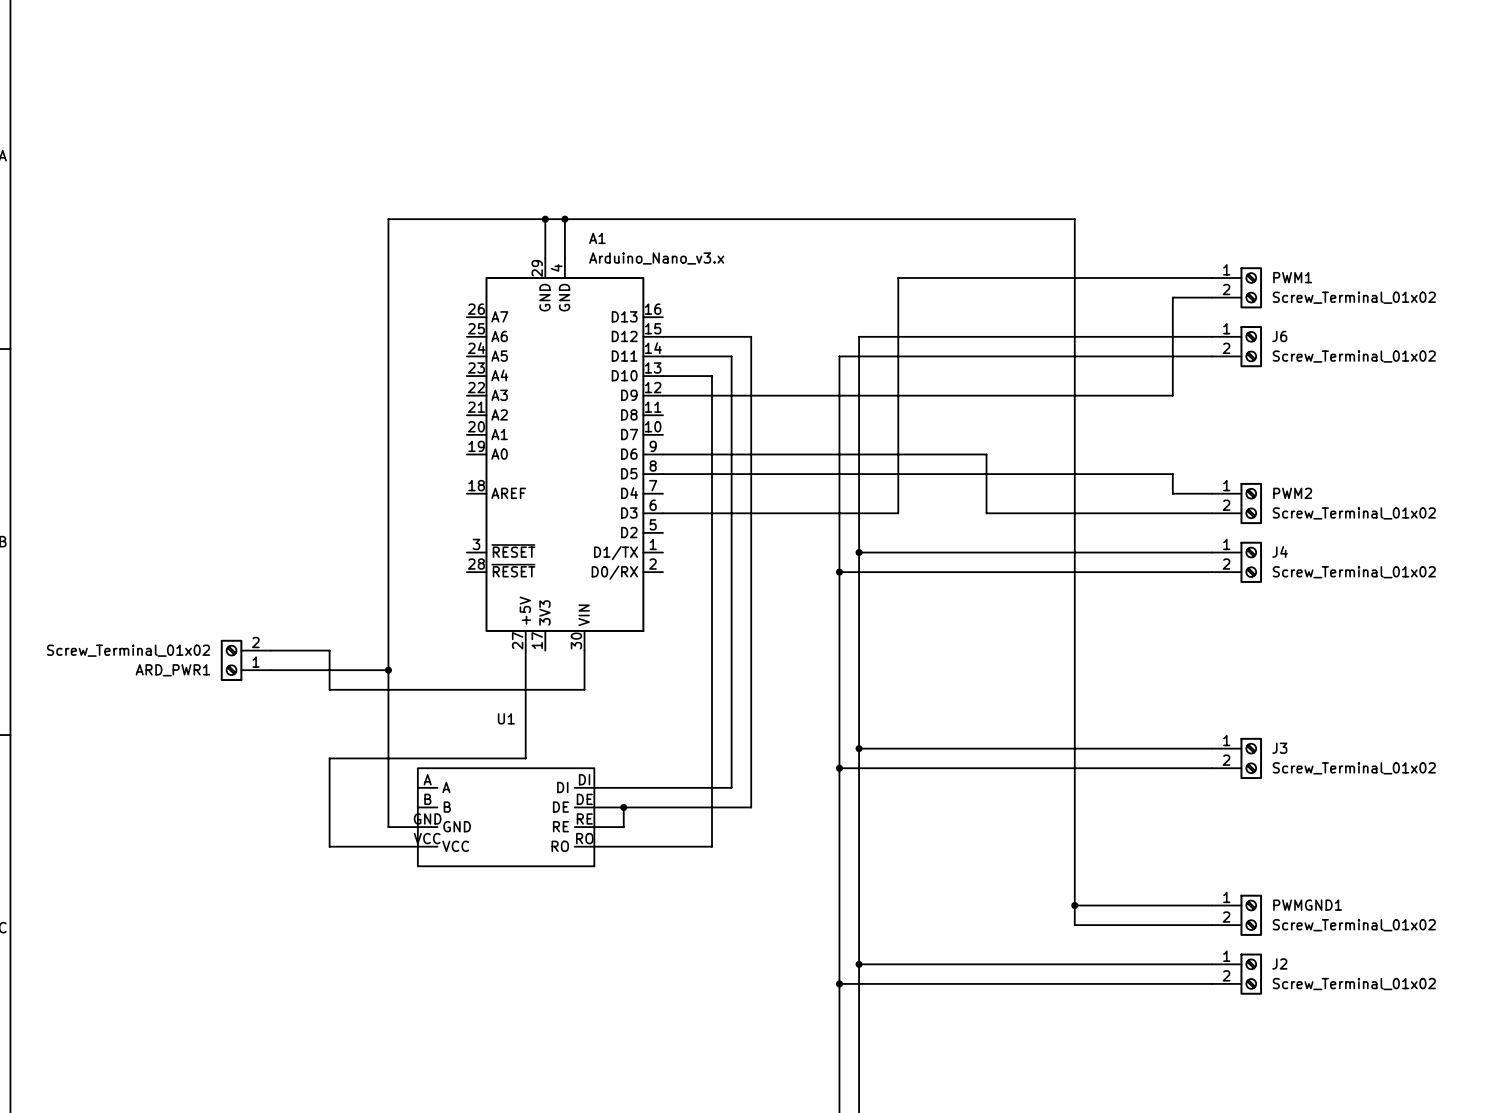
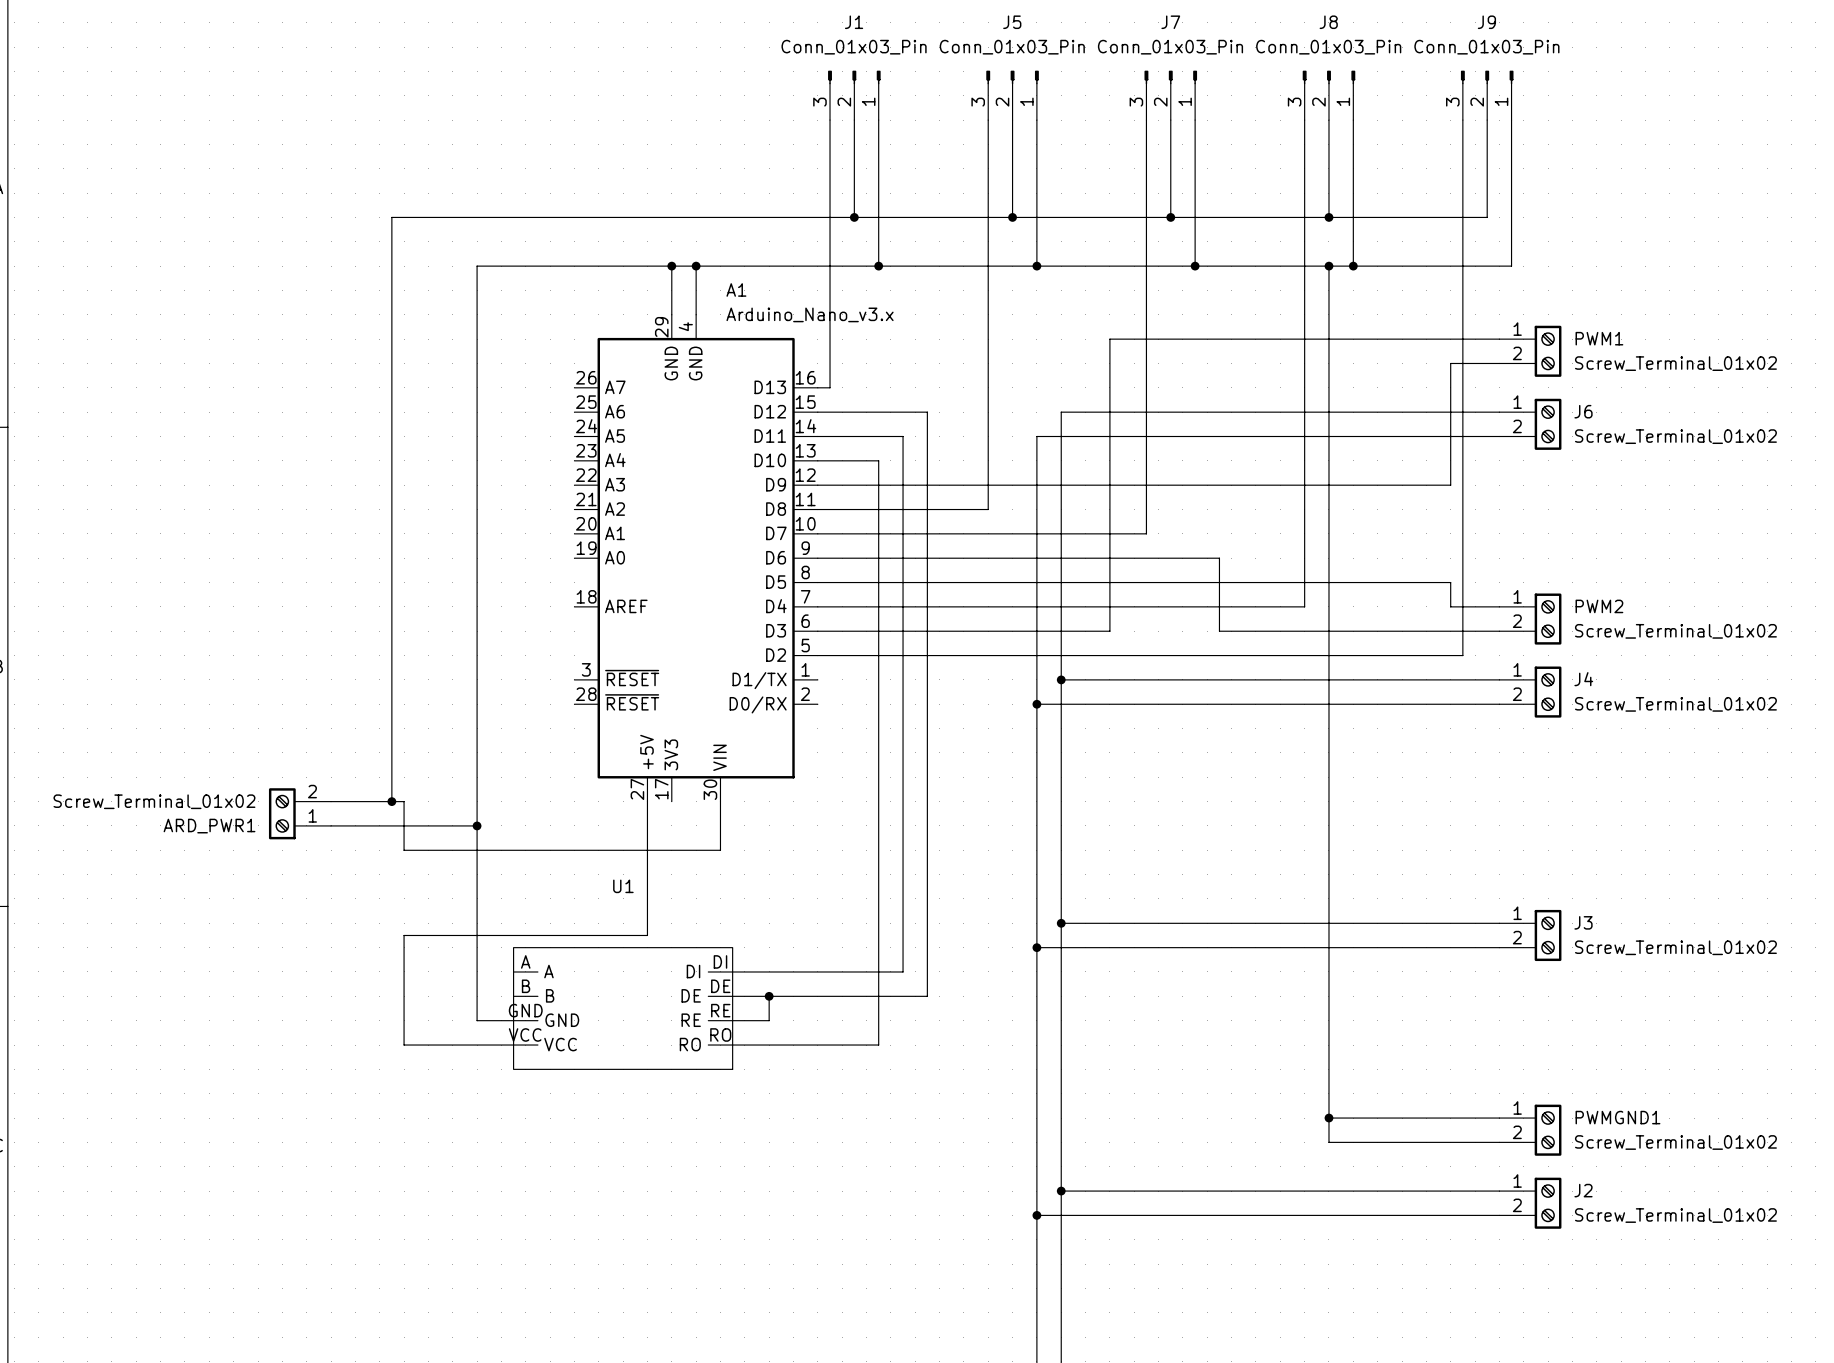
J1: none -> Conn_01x03_Pin (854, 95)
J5: none -> Conn_01x03_Pin (1012, 95)
J7: none -> Conn_01x03_Pin (1170, 95)
J8: none -> Conn_01x03_Pin (1328, 95)
J9: none -> Conn_01x03_Pin (1487, 95)
wire: none -> (830, 120) (830, 387) (817, 387)
wire: none -> (854, 120) (854, 217)
wire: none -> (878, 120) (878, 266)
wire: none -> (988, 120) (988, 509) (817, 509)
wire: none -> (1012, 120) (1012, 217)
wire: none -> (1036, 120) (1036, 266)
wire: none -> (1146, 120) (1146, 533) (817, 533)
wire: none -> (1170, 120) (1170, 217)
wire: none -> (1195, 120) (1195, 266)
wire: none -> (1304, 120) (1304, 606) (817, 606)
wire: none -> (1328, 120) (1328, 217)
wire: none -> (1353, 120) (1353, 266)
wire: none -> (1462, 120) (1462, 655) (817, 655)
wire: none -> (1487, 120) (1487, 217) (391, 217) (391, 801)
wire: none -> (1511, 120) (1511, 266) (1328, 266)
junction: none -> (854, 217)
junction: none -> (1012, 217)
junction: none -> (1170, 217)
junction: none -> (1328, 217)
junction: none -> (878, 266)
junction: none -> (1036, 266)
junction: none -> (1195, 266)
junction: none -> (1328, 266)
junction: none -> (1353, 266)
junction: none -> (391, 801)

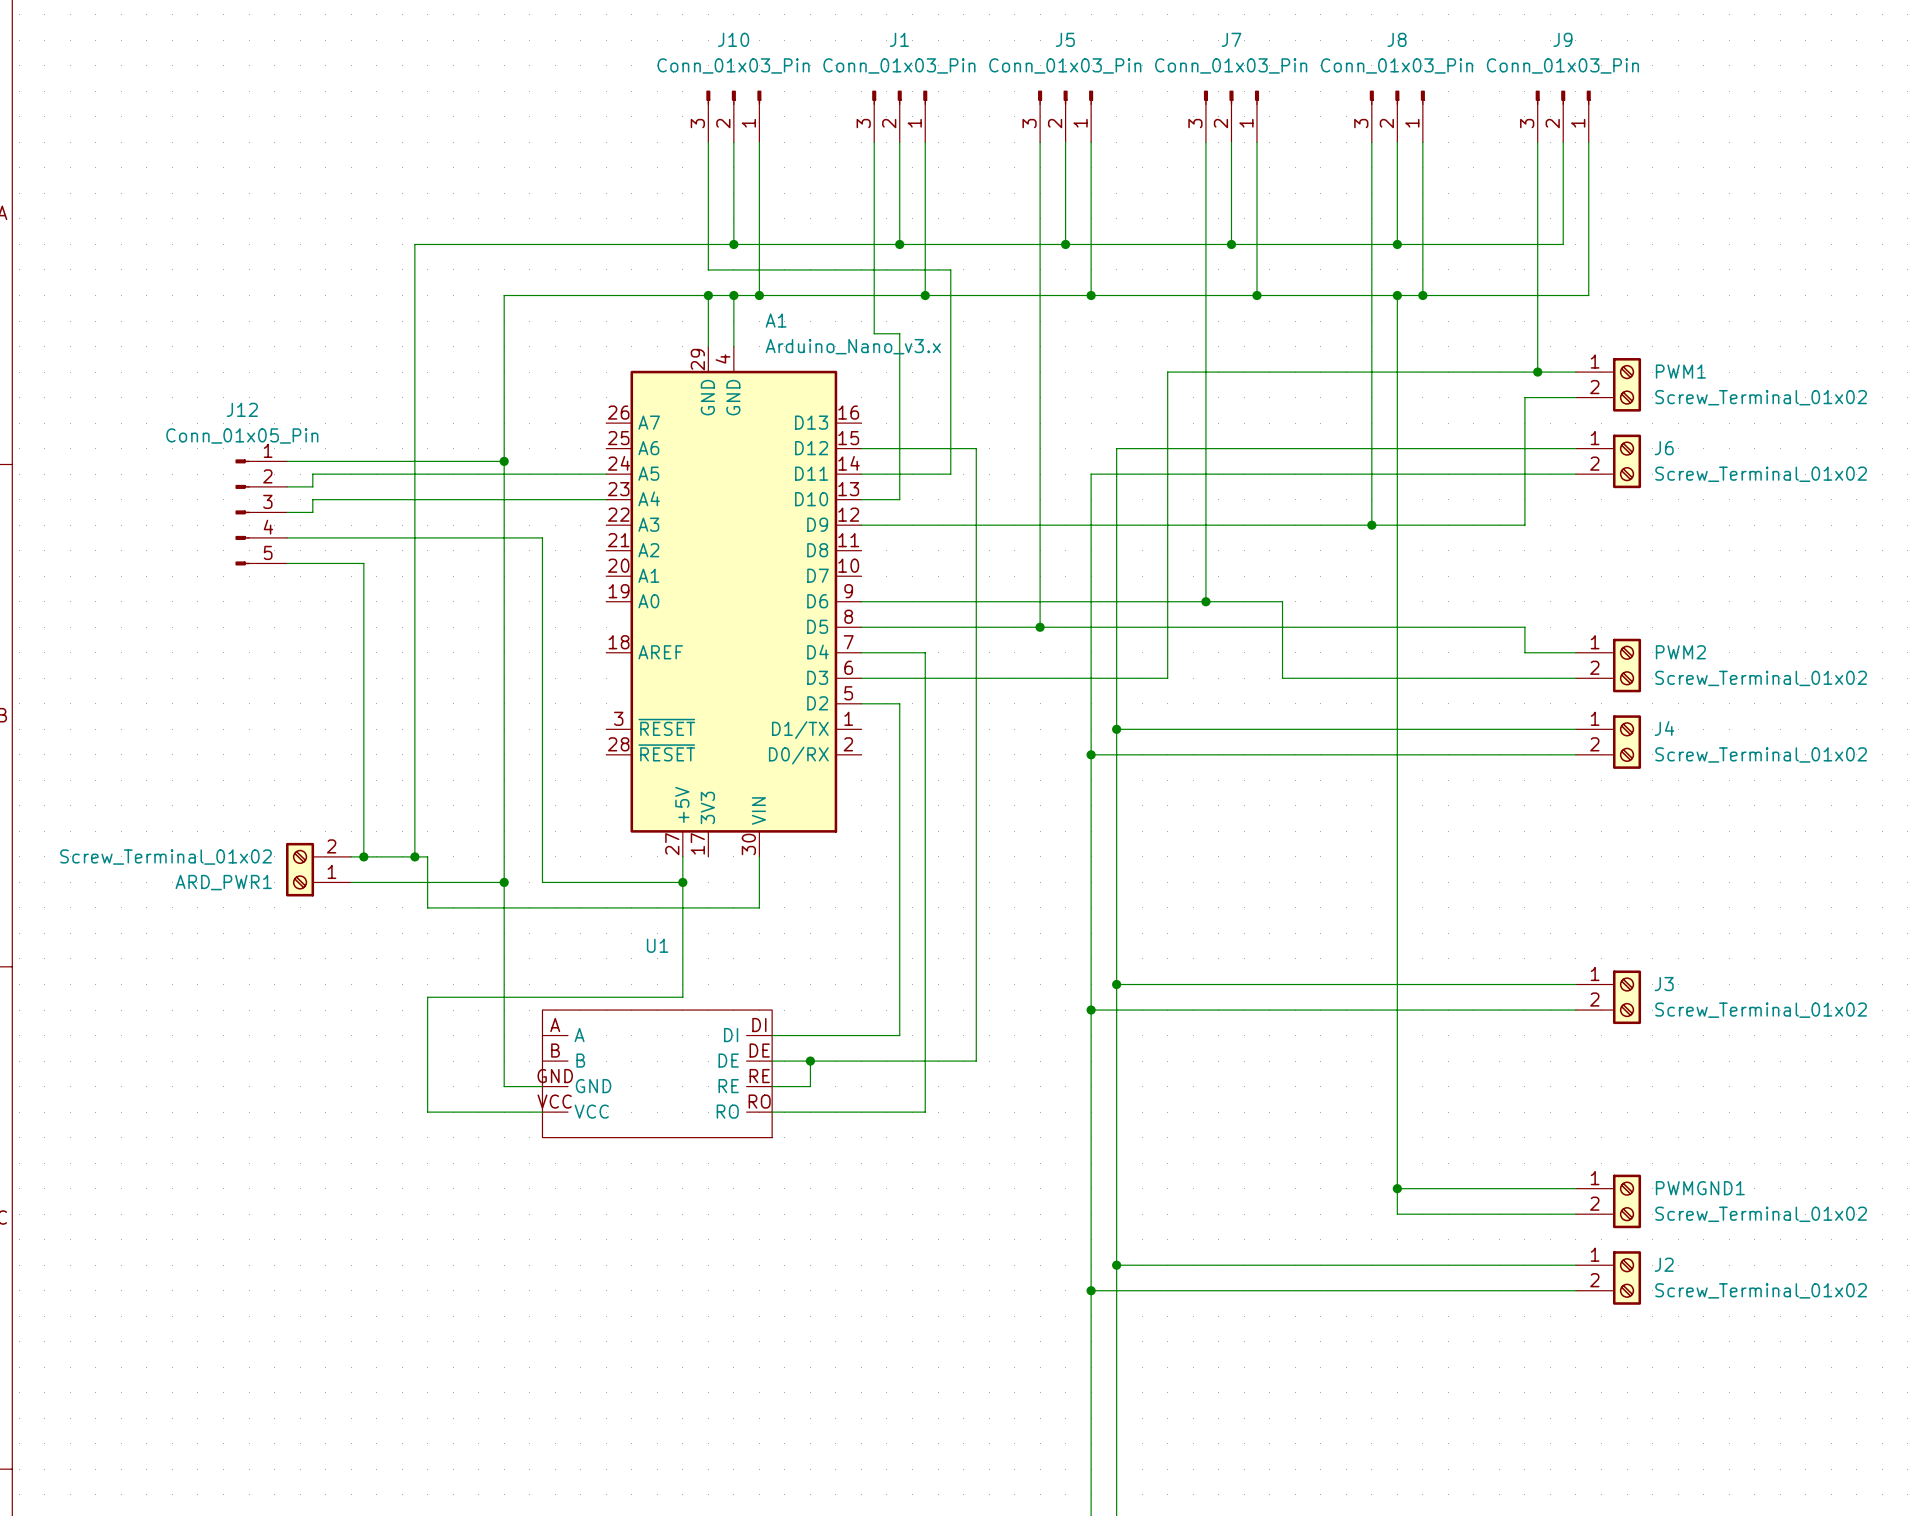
J10: none -> Conn_01x03_Pin (733, 116)
wire: none -> (708, 142) (708, 269) (950, 269) (950, 474)
wire: none -> (733, 142) (733, 244)
wire: none -> (759, 142) (759, 295)
junction: none -> (733, 244)
junction: none -> (759, 295)
wire: (830, 302) (830, 387) (817, 387) -> (874, 333) (899, 333) (899, 499)
wire: (1462, 339) (1462, 655) (854, 655) -> none
junction: none -> (1537, 372)
wire: none -> (287, 461) (504, 461)
junction: none -> (504, 461)
wire: none -> (606, 474) (312, 474) (312, 486) (287, 486)
wire: (903, 436) (903, 971) (854, 971) -> (899, 703) (899, 1035)
wire: none -> (606, 499) (312, 499) (312, 512) (287, 512)
wire: (854, 460) (878, 460) (878, 606) (1304, 606) (1304, 485) -> none
J12: none -> Conn_01x05_Pin (261, 512)
junction: none -> (1371, 525)
wire: none -> (287, 537) (542, 537) (542, 882) (682, 882)
wire: (817, 509) (988, 509) -> (1040, 627) (1040, 550)
wire: none -> (287, 563) (363, 563) (363, 856)
wire: (817, 533) (1146, 533) -> (1205, 601) (1205, 576)
junction: none -> (1205, 601)
junction: none -> (1040, 627)
junction: none -> (363, 856)
junction: none -> (682, 882)

